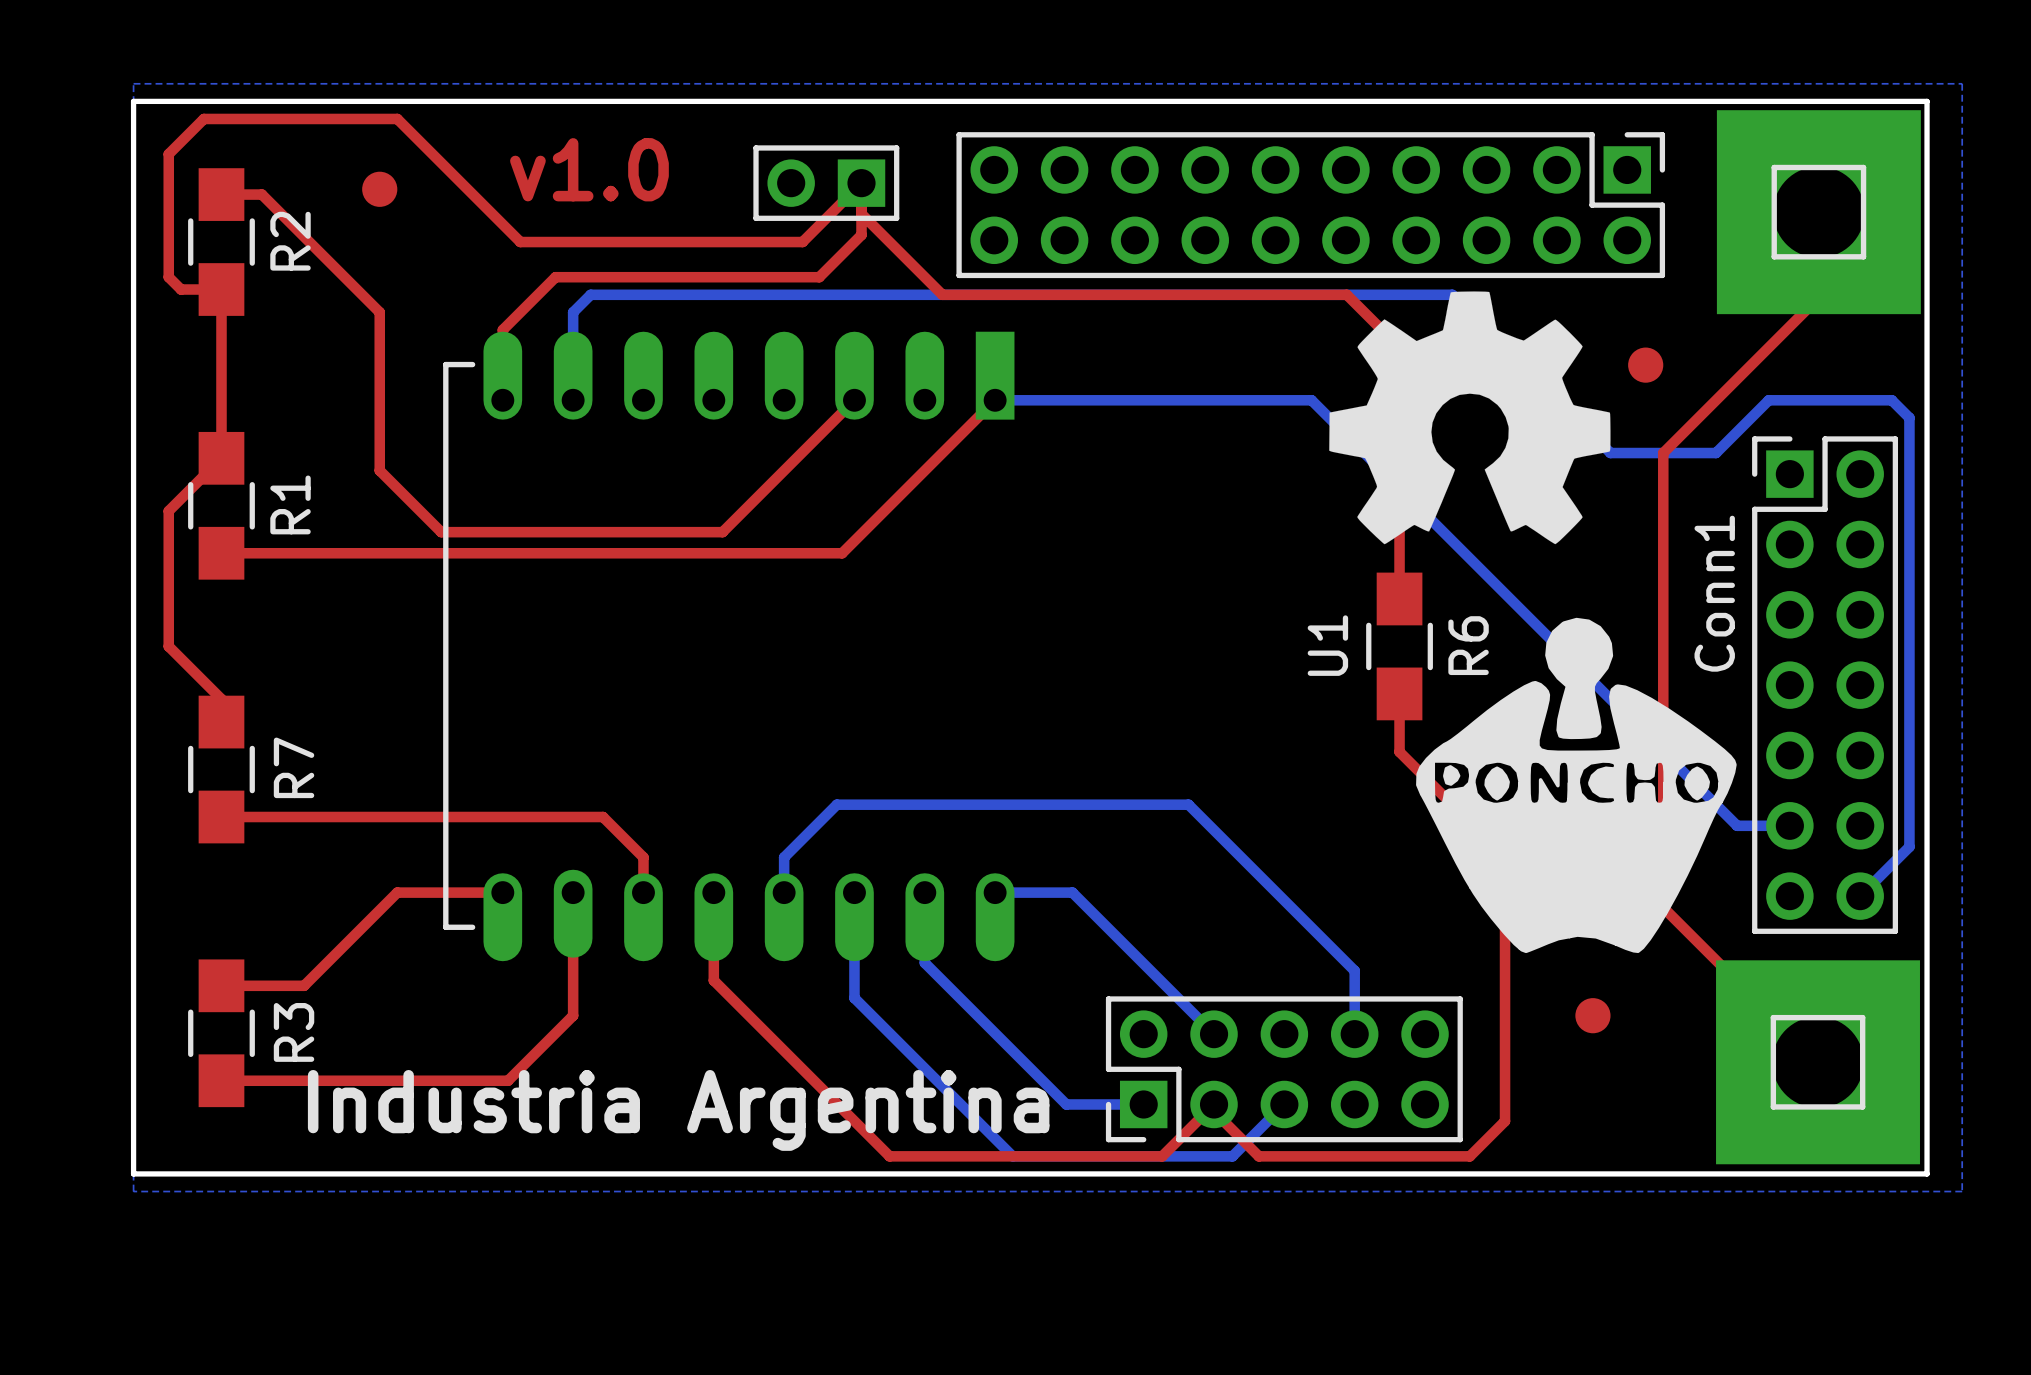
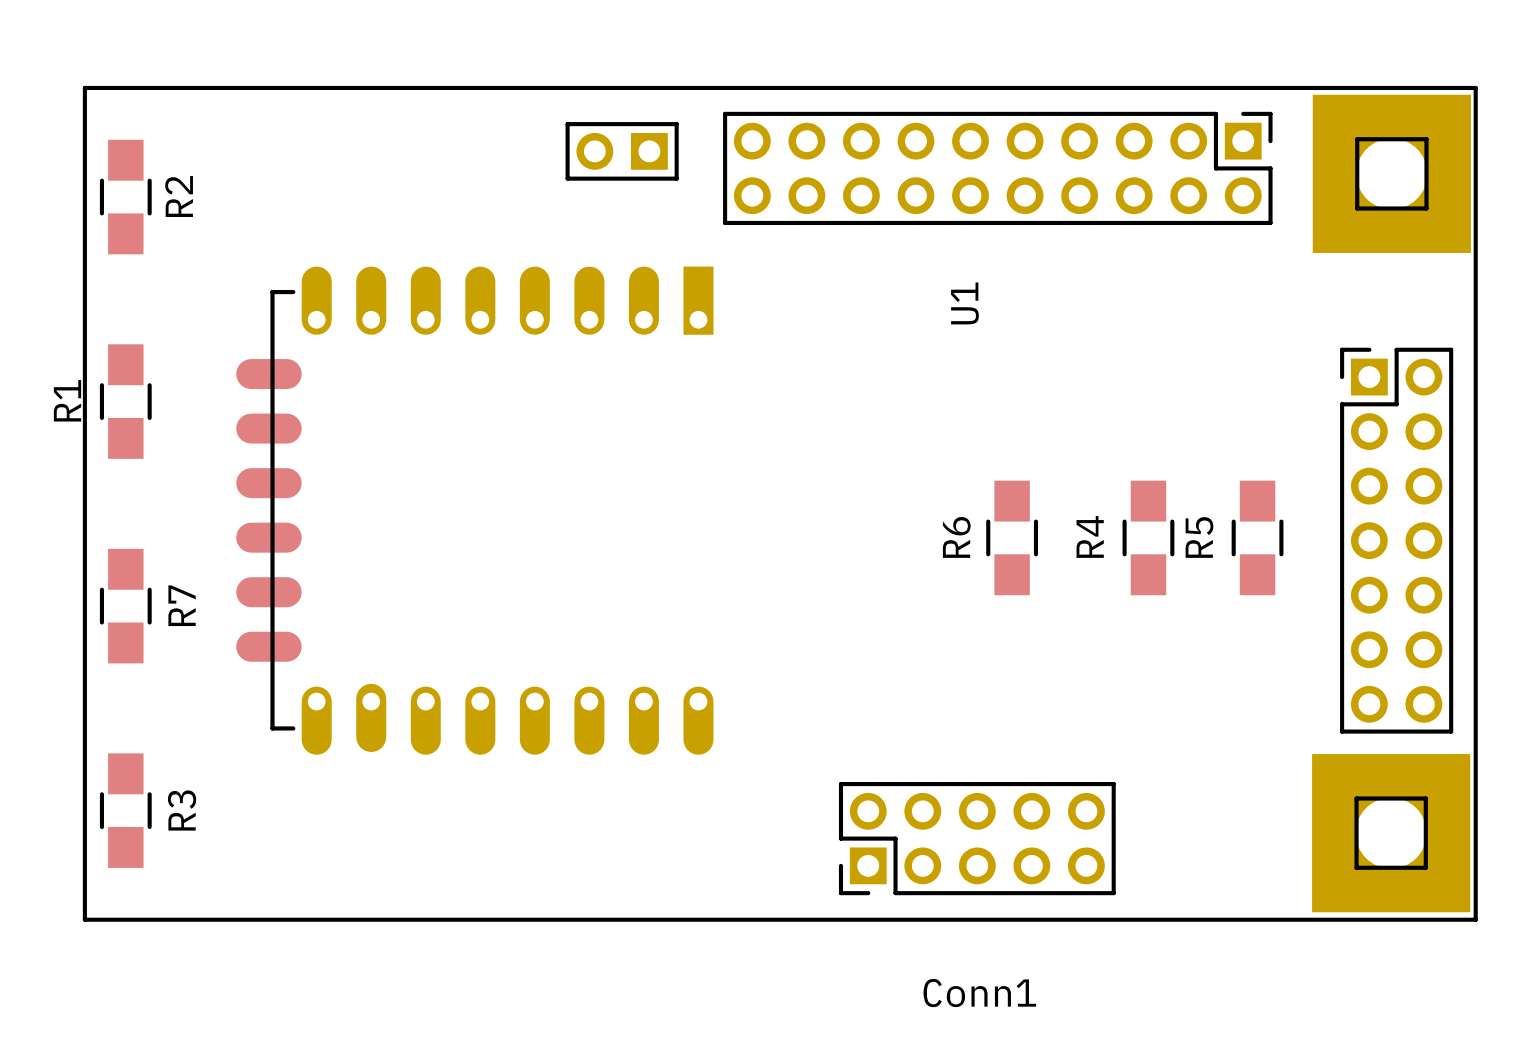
bottom zone outline: (133, 83) (1962, 83) (1962, 1191) (133, 1191) (133, 83) -> none
text: v1.0 (589, 169) -> none
part: (379, 189) -> none
top track: (221, 194) (261, 194) (379, 312) (379, 470) (441, 532) (722, 532) (854, 400) -> none
top track: (1818, 212) (1818, 297) (1663, 453) (1663, 907) (1818, 1062) -> none
top track: (861, 213) (942, 294) (1346, 294) (1399, 347) (1399, 598) -> none
R2 position: (221, 242) -> (125, 197)
drawing: [1329, 291, 1611, 545] -> none
U1 footprint: [443, 331, 1015, 962] -> [236, 266, 714, 755]
part: (1645, 365) -> none
top track: (502, 400) (502, 329) (555, 277) (819, 277) (861, 235) (861, 183) (802, 242) (520, 242) (397, 118) (203, 118) (168, 154) (168, 277) (181, 289) (221, 289) (221, 458) (168, 511) (168, 646) (221, 699) (221, 722) -> none
bottom track: (573, 400) (573, 312) (590, 294) (1452, 294) (1610, 453) (1716, 453) (1768, 400) (1891, 400) (1909, 417) (1909, 846) (1860, 896) -> none
bottom track: (995, 400) (1311, 400) (1737, 825) (1789, 825) -> none
top track: (995, 400) (842, 553) (221, 553) -> none
R1 name position: R1 (290, 504) -> R1 (67, 400)
R1 position: (221, 505) -> (125, 401)
Conn1 name rotation: 0° (1714, 593) -> 90° clockwise (979, 993)
Conn1 name position: Conn1 (1714, 593) -> Conn1 (979, 993)
drawing: [1416, 617, 1737, 954] -> none
U1 name position: U1 (1327, 645) -> U1 (964, 303)
R6 name position: R6 (1468, 645) -> R6 (956, 537)
R6 position: (1399, 646) -> (1012, 537)
R4: none -> (1148, 537)
R5: none -> (1257, 537)
top track: (1399, 693) (1399, 751) (1505, 857) (1505, 1121) (1469, 1156) (1258, 1156) (1214, 1111) (1214, 1104) (1162, 1156) (889, 1156) (713, 980) (713, 892) -> none
R7 position: (221, 769) -> (125, 606)
top track: (221, 817) (603, 817) (643, 857) (643, 892) -> none
top track: (502, 892) (397, 892) (304, 985) (221, 985) -> none
top track: (573, 892) (573, 1015) (508, 1080) (221, 1080) -> none
bottom track: (784, 892) (784, 857) (836, 804) (1188, 804) (1354, 970) (1354, 1034) -> none
bottom track: (854, 892) (854, 998) (1012, 1156) (1232, 1156) (1284, 1104) -> none
bottom track: (924, 892) (924, 962) (1066, 1104) (1143, 1104) -> none
bottom track: (995, 892) (1072, 892) (1214, 1034) -> none
part: (1592, 1015) -> none
R3 position: (221, 1033) -> (125, 810)
text: Industria Argentina (678, 1110) -> none

